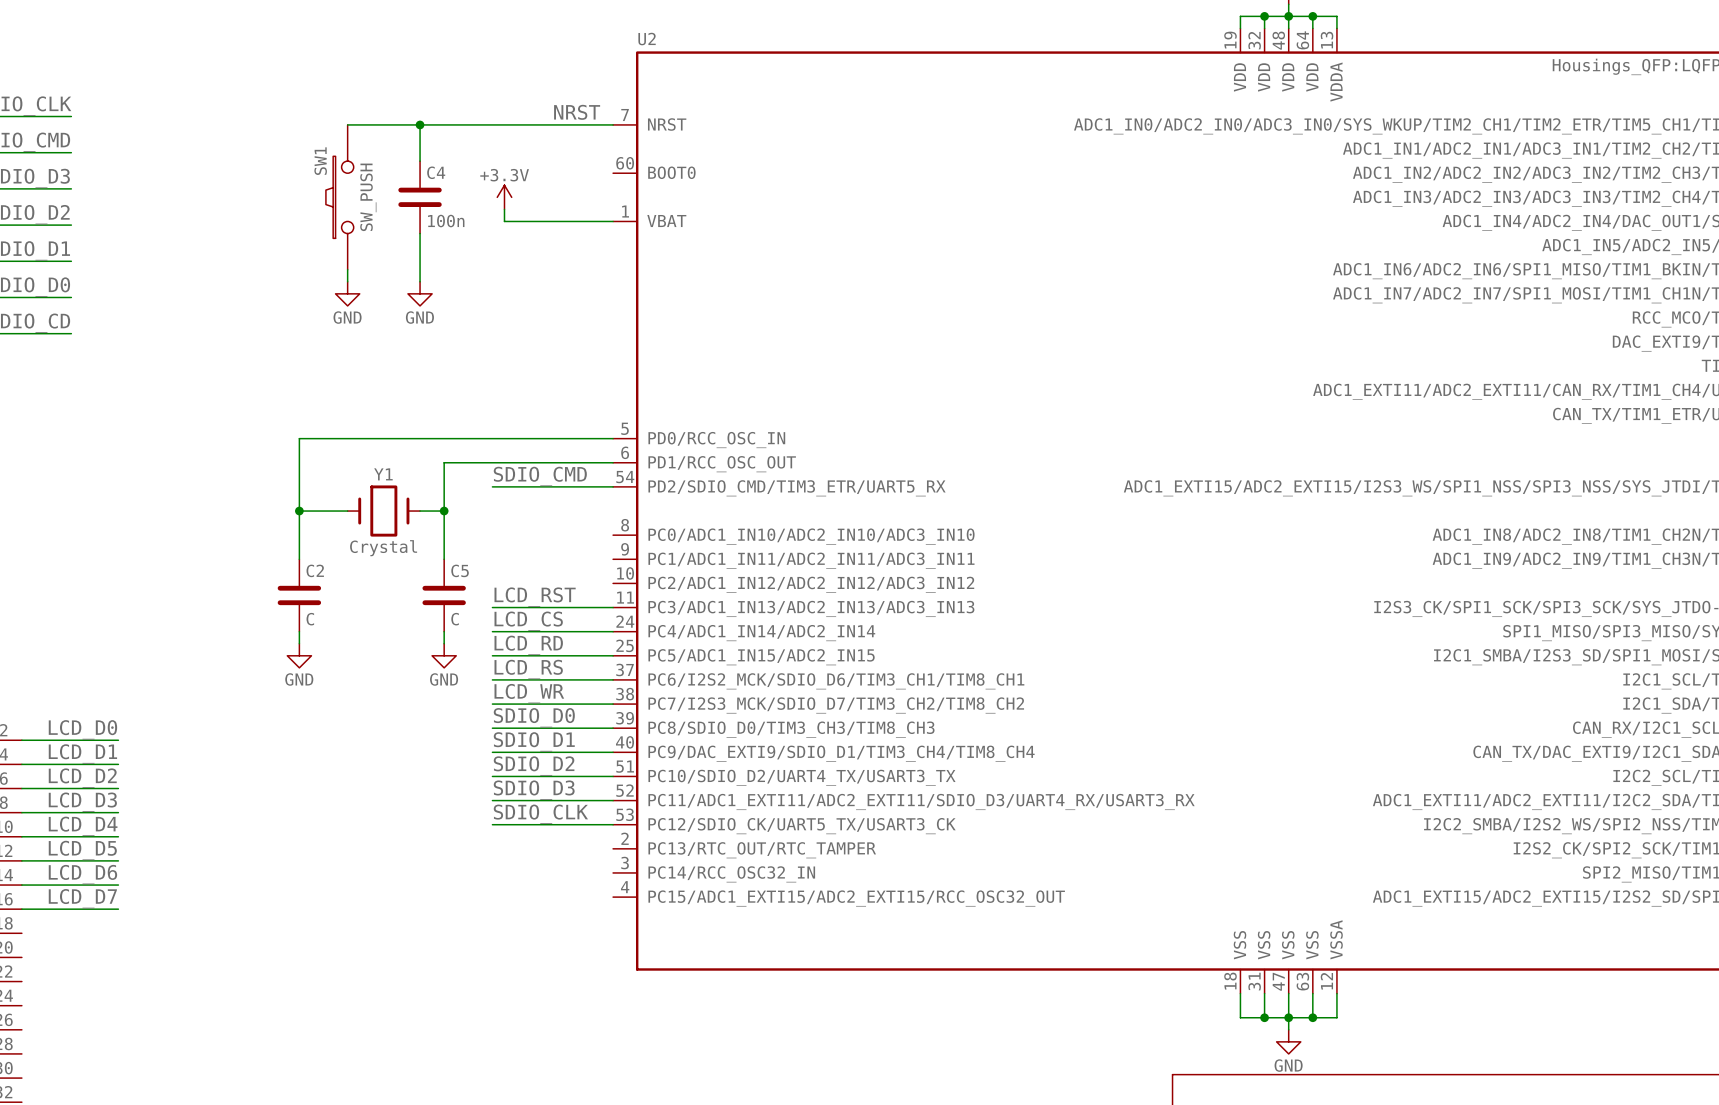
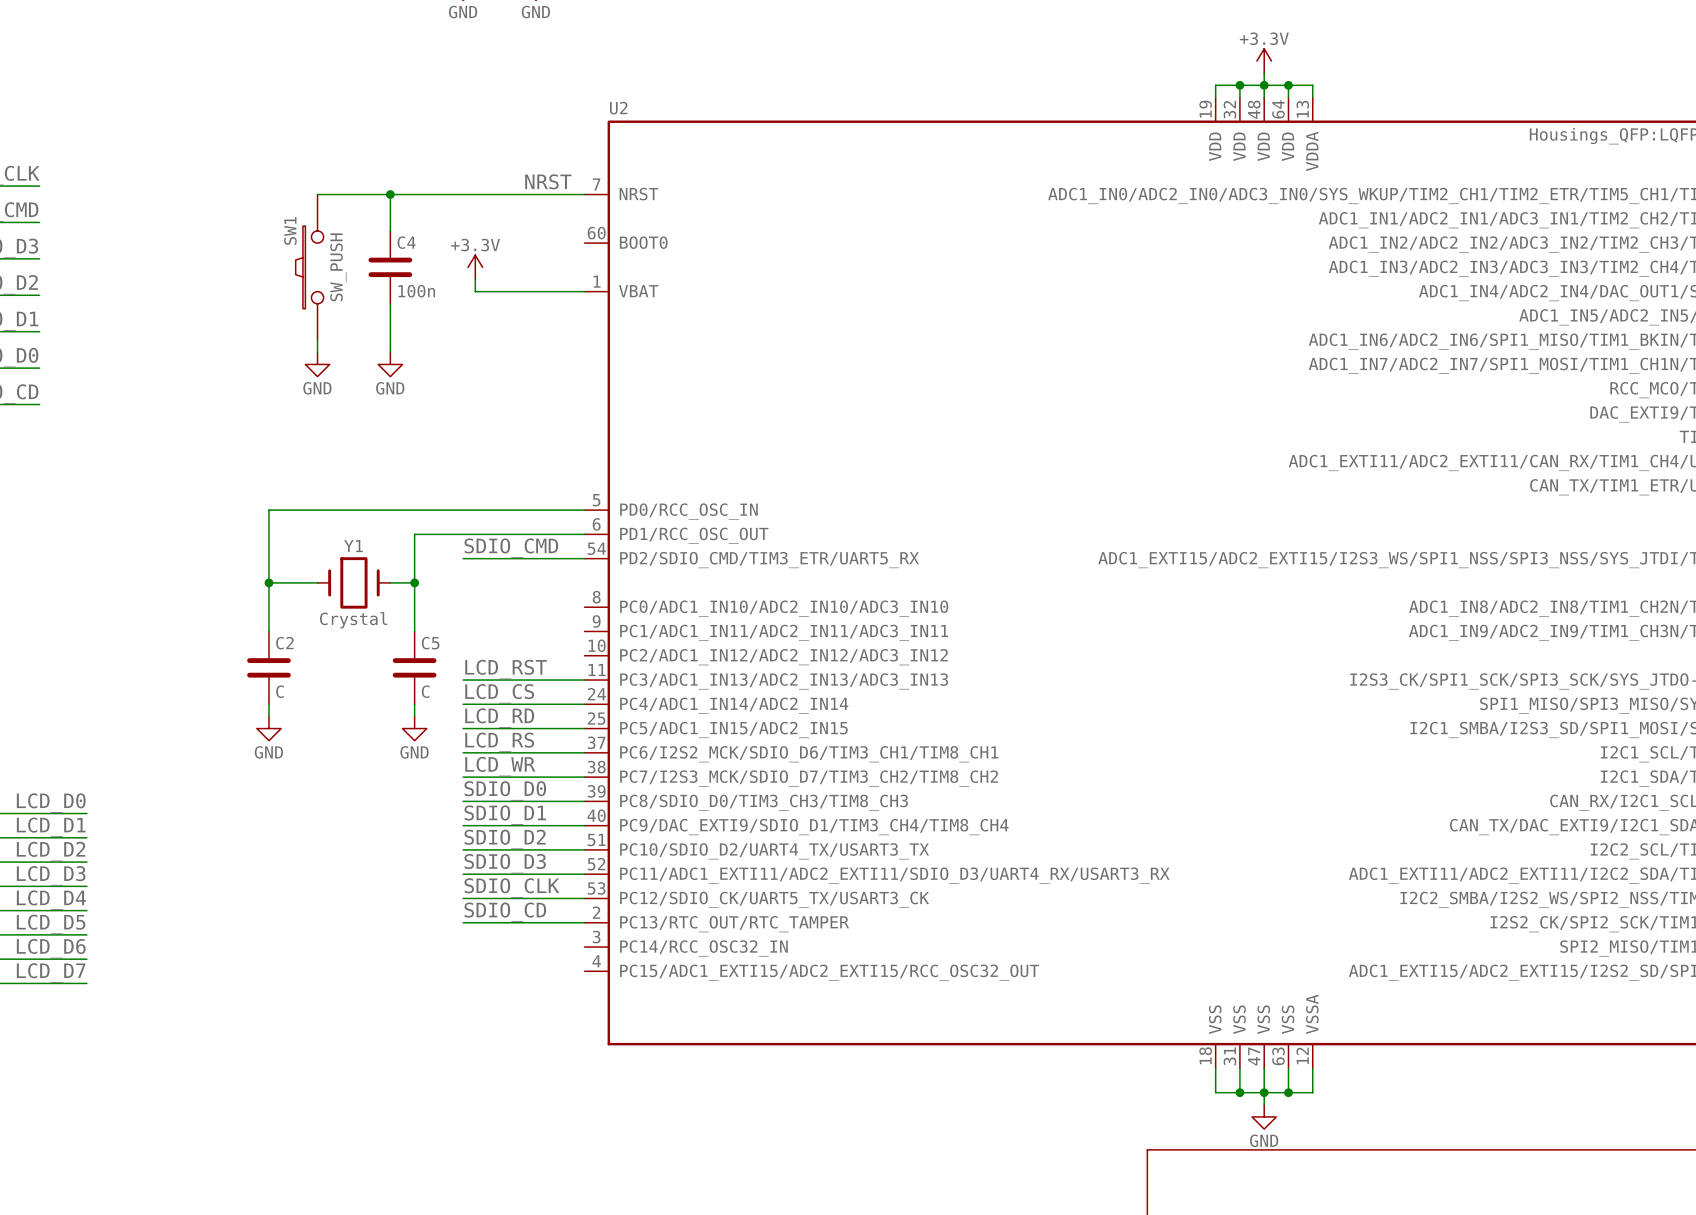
label: none -> SDIO_CD (505, 912)
wire: none -> (463, 922) (584, 922)

